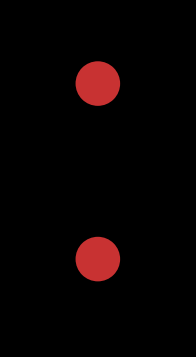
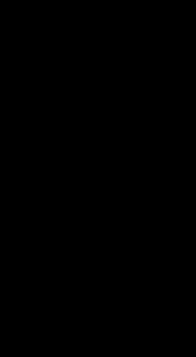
part: (97, 83) -> none
part: (97, 259) -> none

